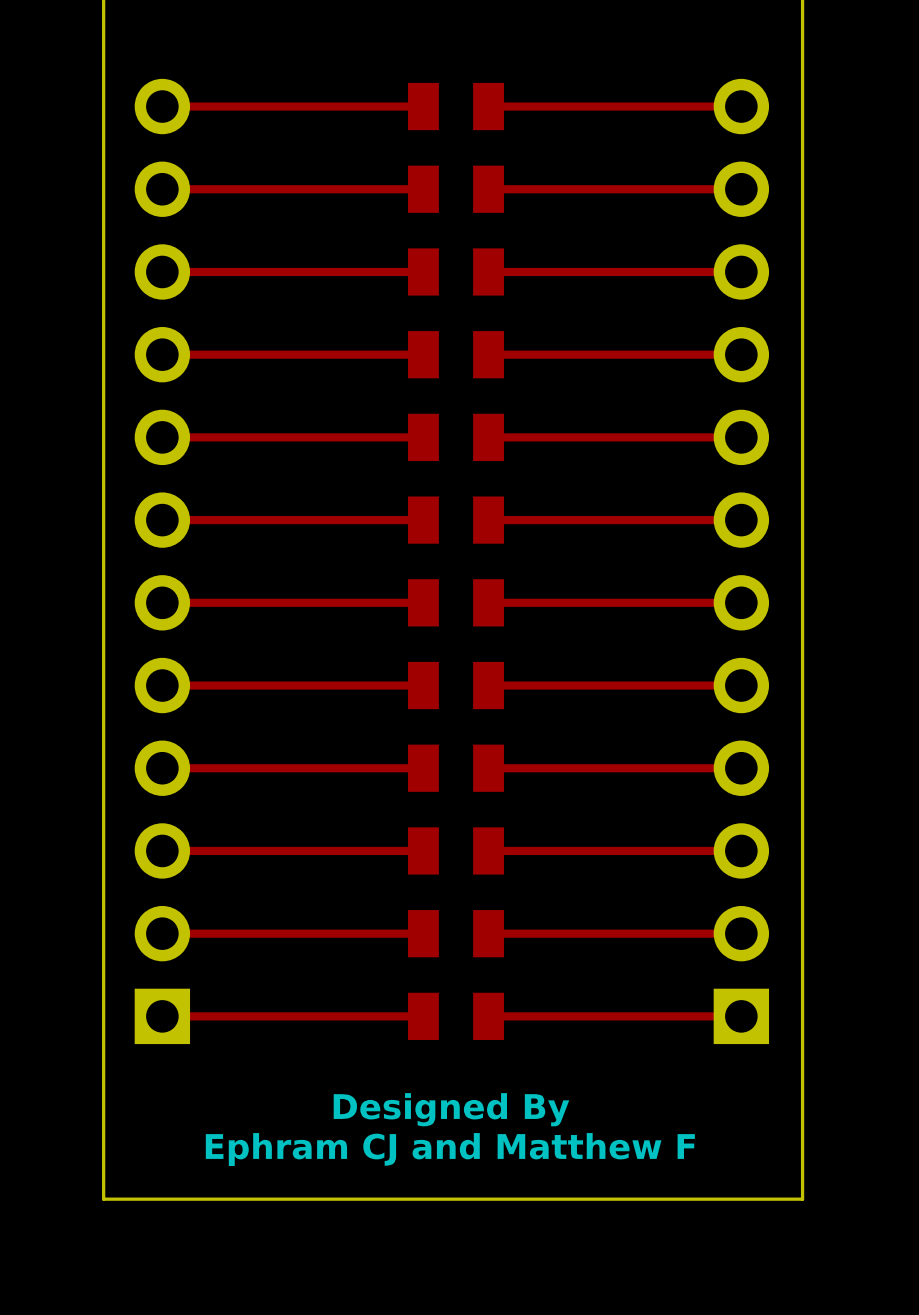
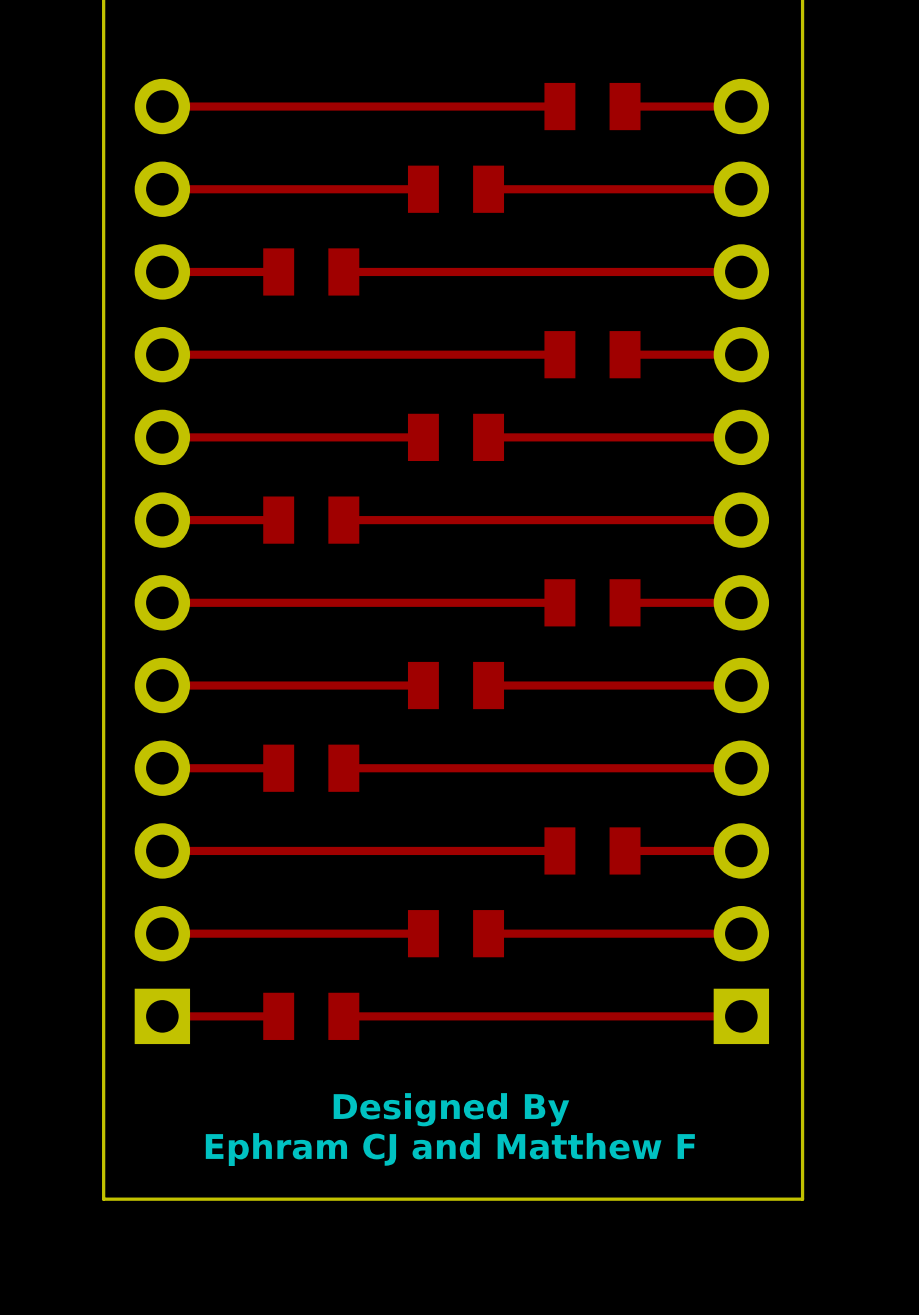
part: (456, 106) -> none
part: none -> (592, 106)
top track: (625, 106) (559, 106) -> (488, 106) (423, 106)
part: none -> (311, 271)
top track: (343, 271) (278, 271) -> (488, 271) (423, 271)
part: (456, 271) -> none
part: (456, 354) -> none
part: none -> (592, 354)
top track: (625, 354) (559, 354) -> (488, 354) (423, 354)
part: none -> (311, 520)
top track: (343, 520) (278, 520) -> (488, 520) (423, 520)
part: (456, 520) -> none
part: (456, 602) -> none
part: none -> (592, 602)
top track: (625, 602) (559, 602) -> (488, 602) (423, 602)
part: none -> (311, 768)
top track: (343, 768) (278, 768) -> (488, 768) (423, 768)
part: (456, 768) -> none
part: (456, 850) -> none
part: none -> (592, 850)
top track: (625, 850) (559, 850) -> (488, 850) (423, 850)
part: none -> (311, 1016)
top track: (343, 1016) (278, 1016) -> (488, 1016) (423, 1016)
part: (456, 1016) -> none

